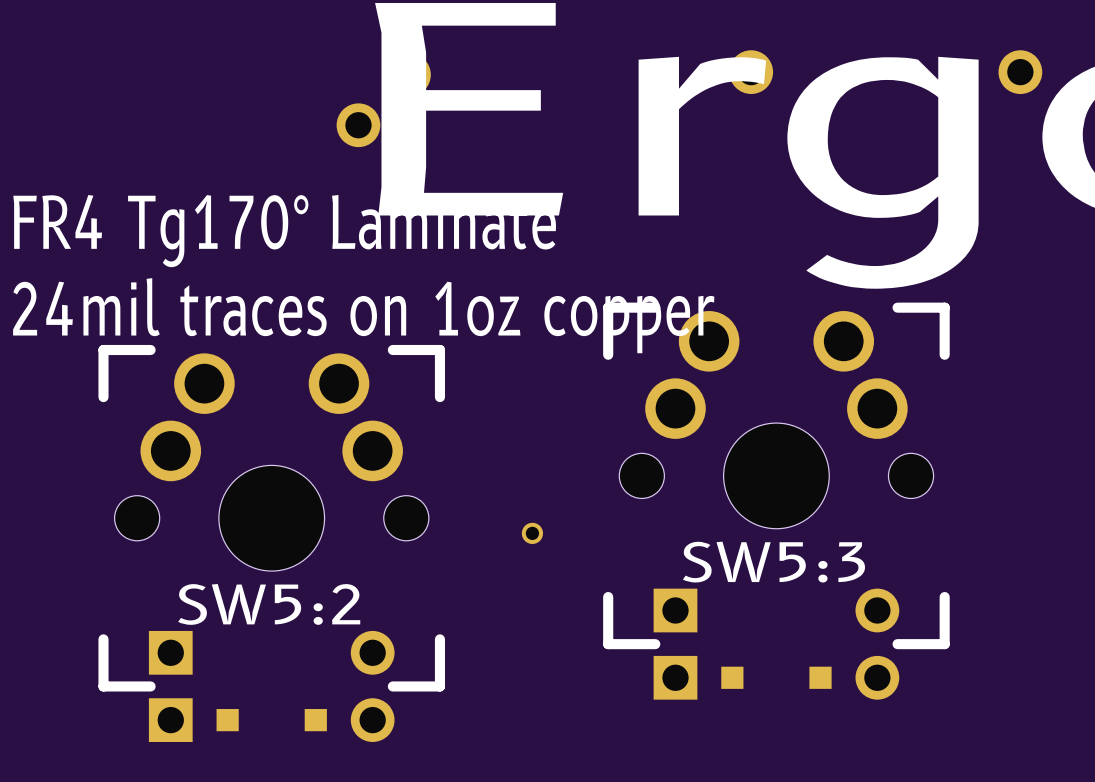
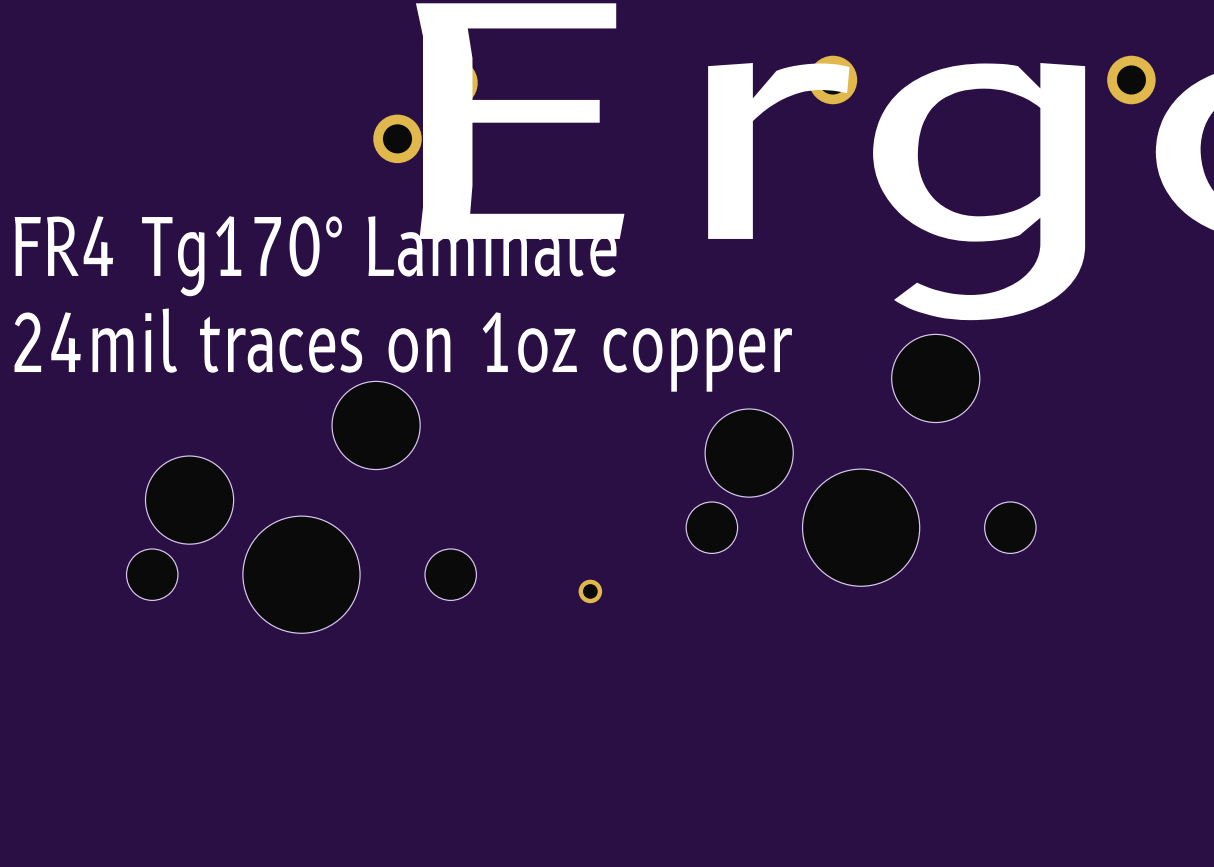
part: none -> (861, 460)
part: none -> (301, 507)
part: SW5:3 (776, 501) -> none
part: SW5:2 (271, 543) -> none

